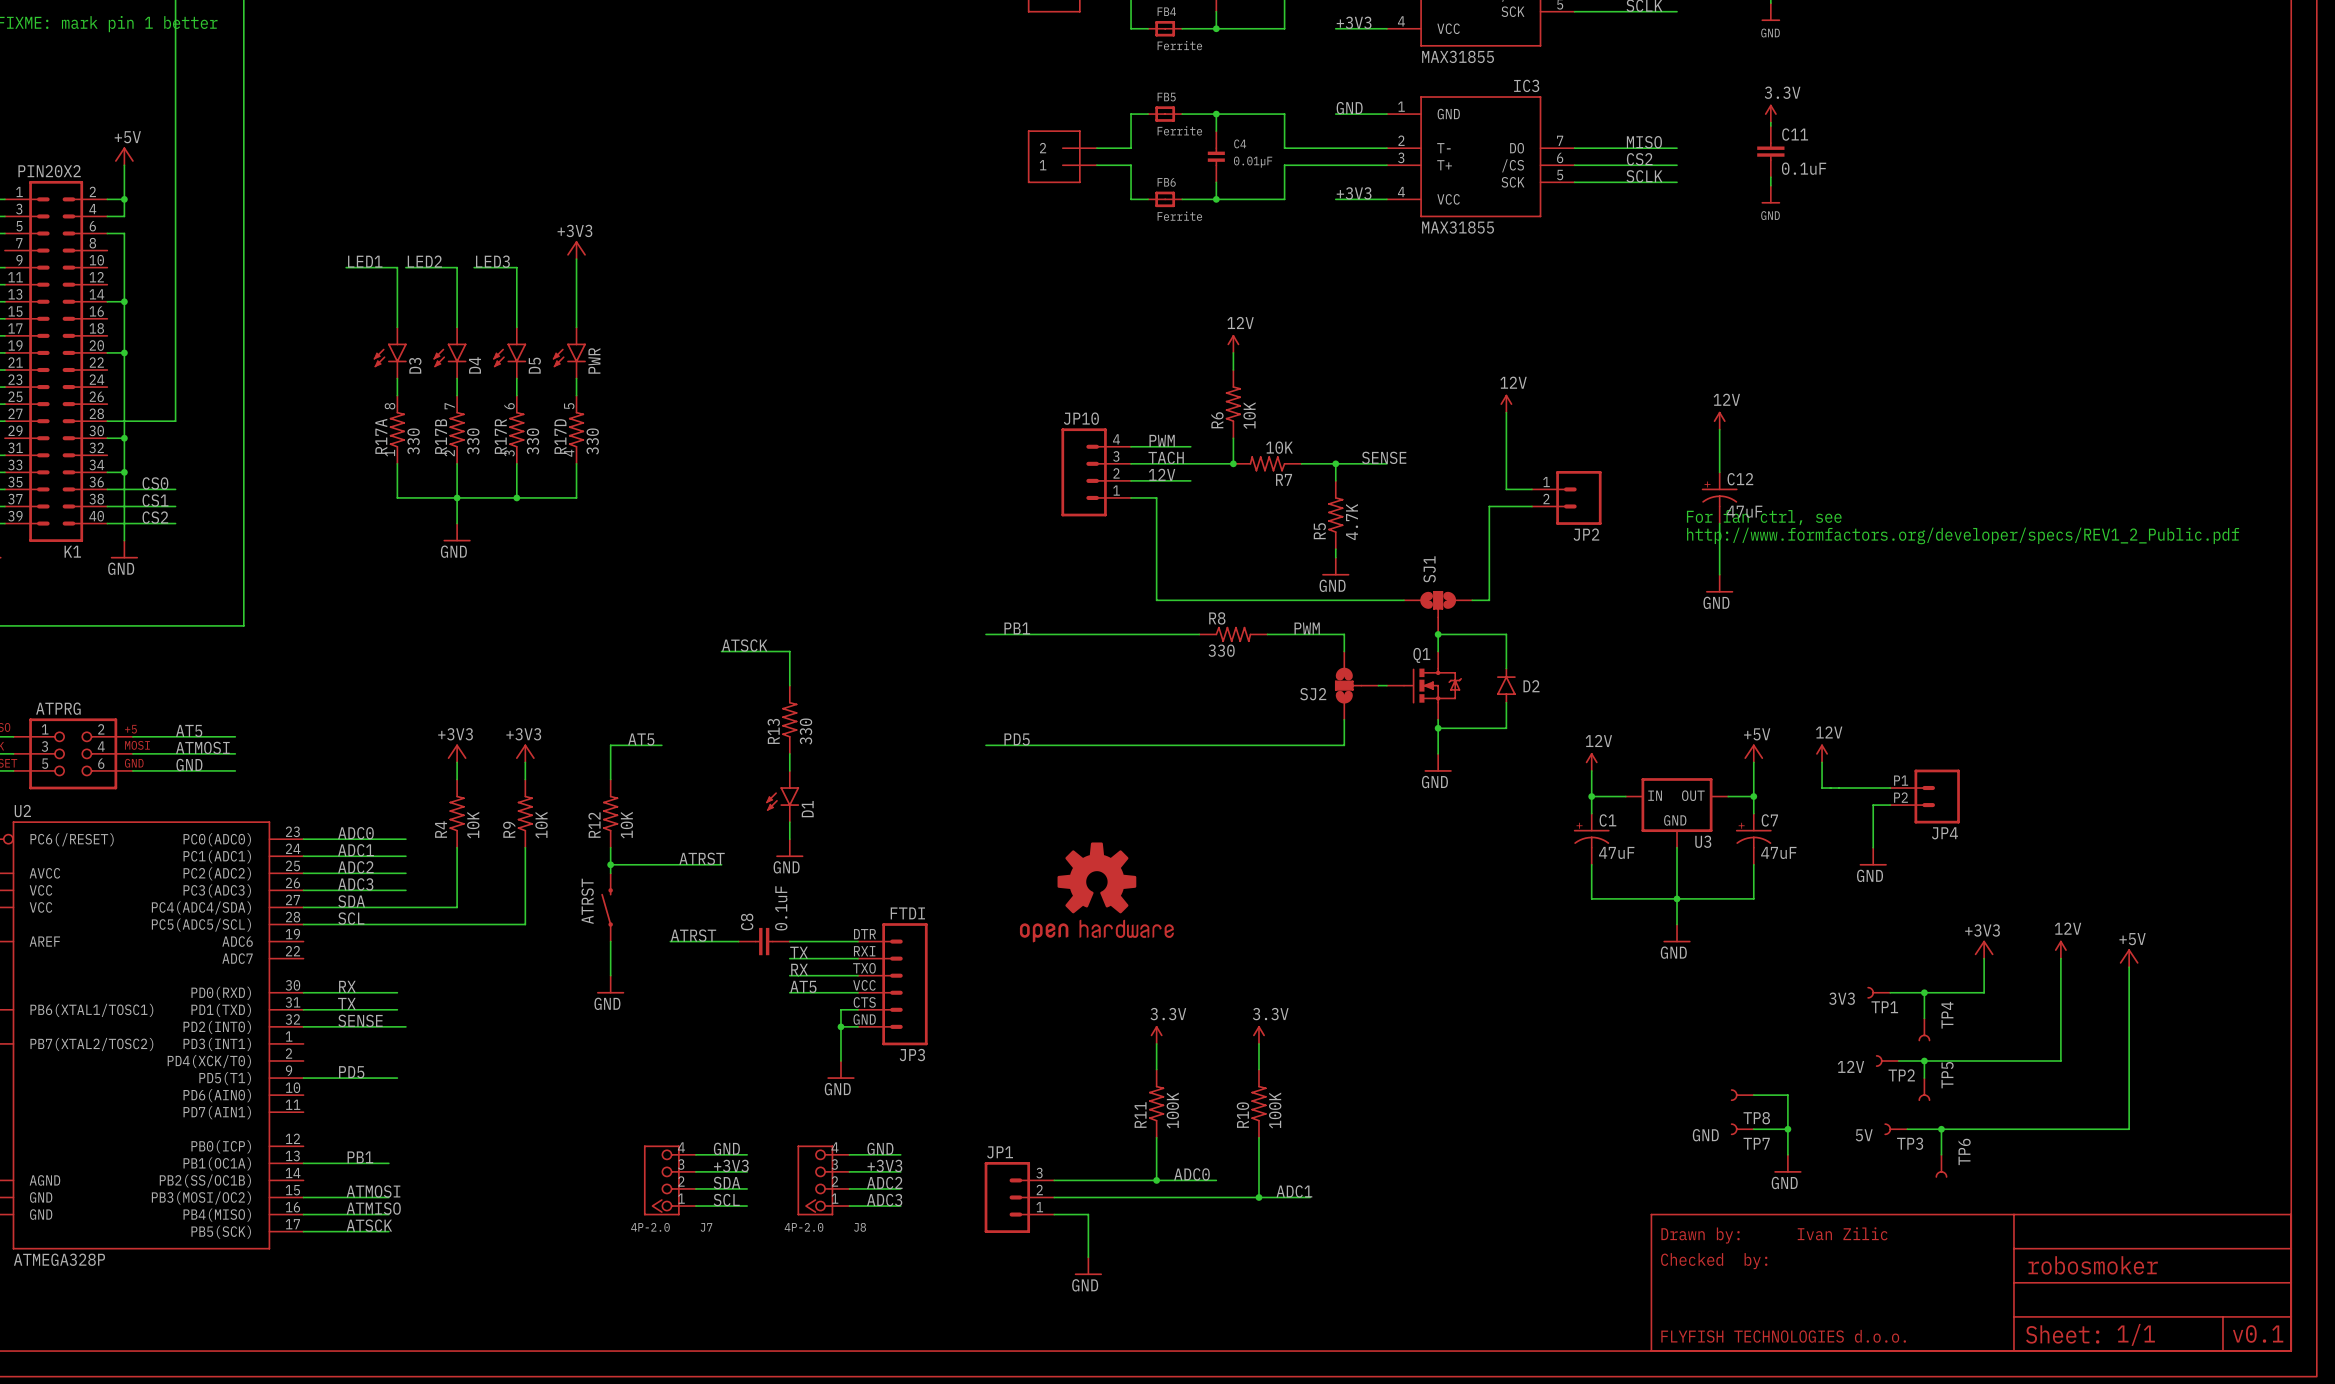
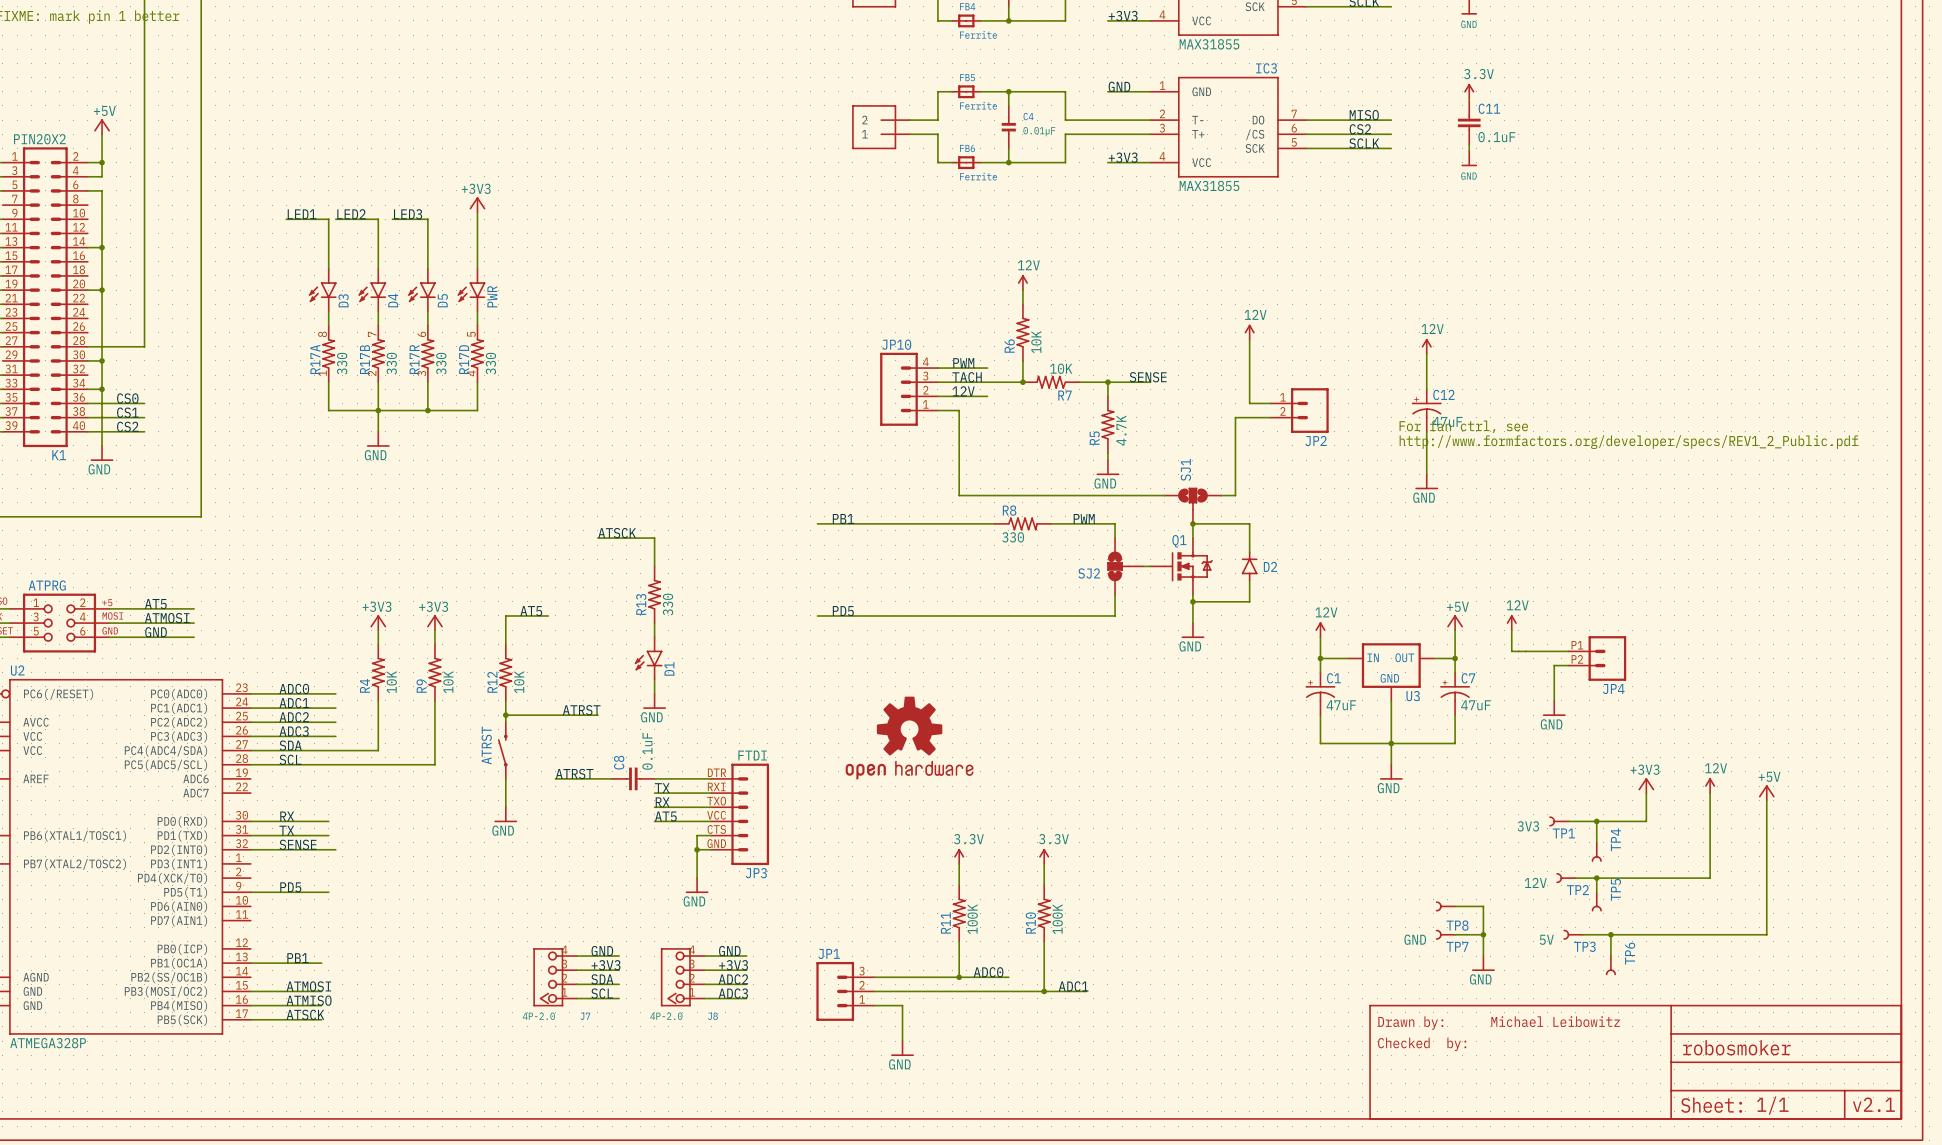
text: Ivan Zilic (1842, 1233) -> Michael Leibowitz (1555, 1021)
text: v0.1 (2258, 1333) -> v2.1 (1873, 1104)
text: FLYFISH TECHNOLOGIES d.o.o. (1783, 1336) -> none

